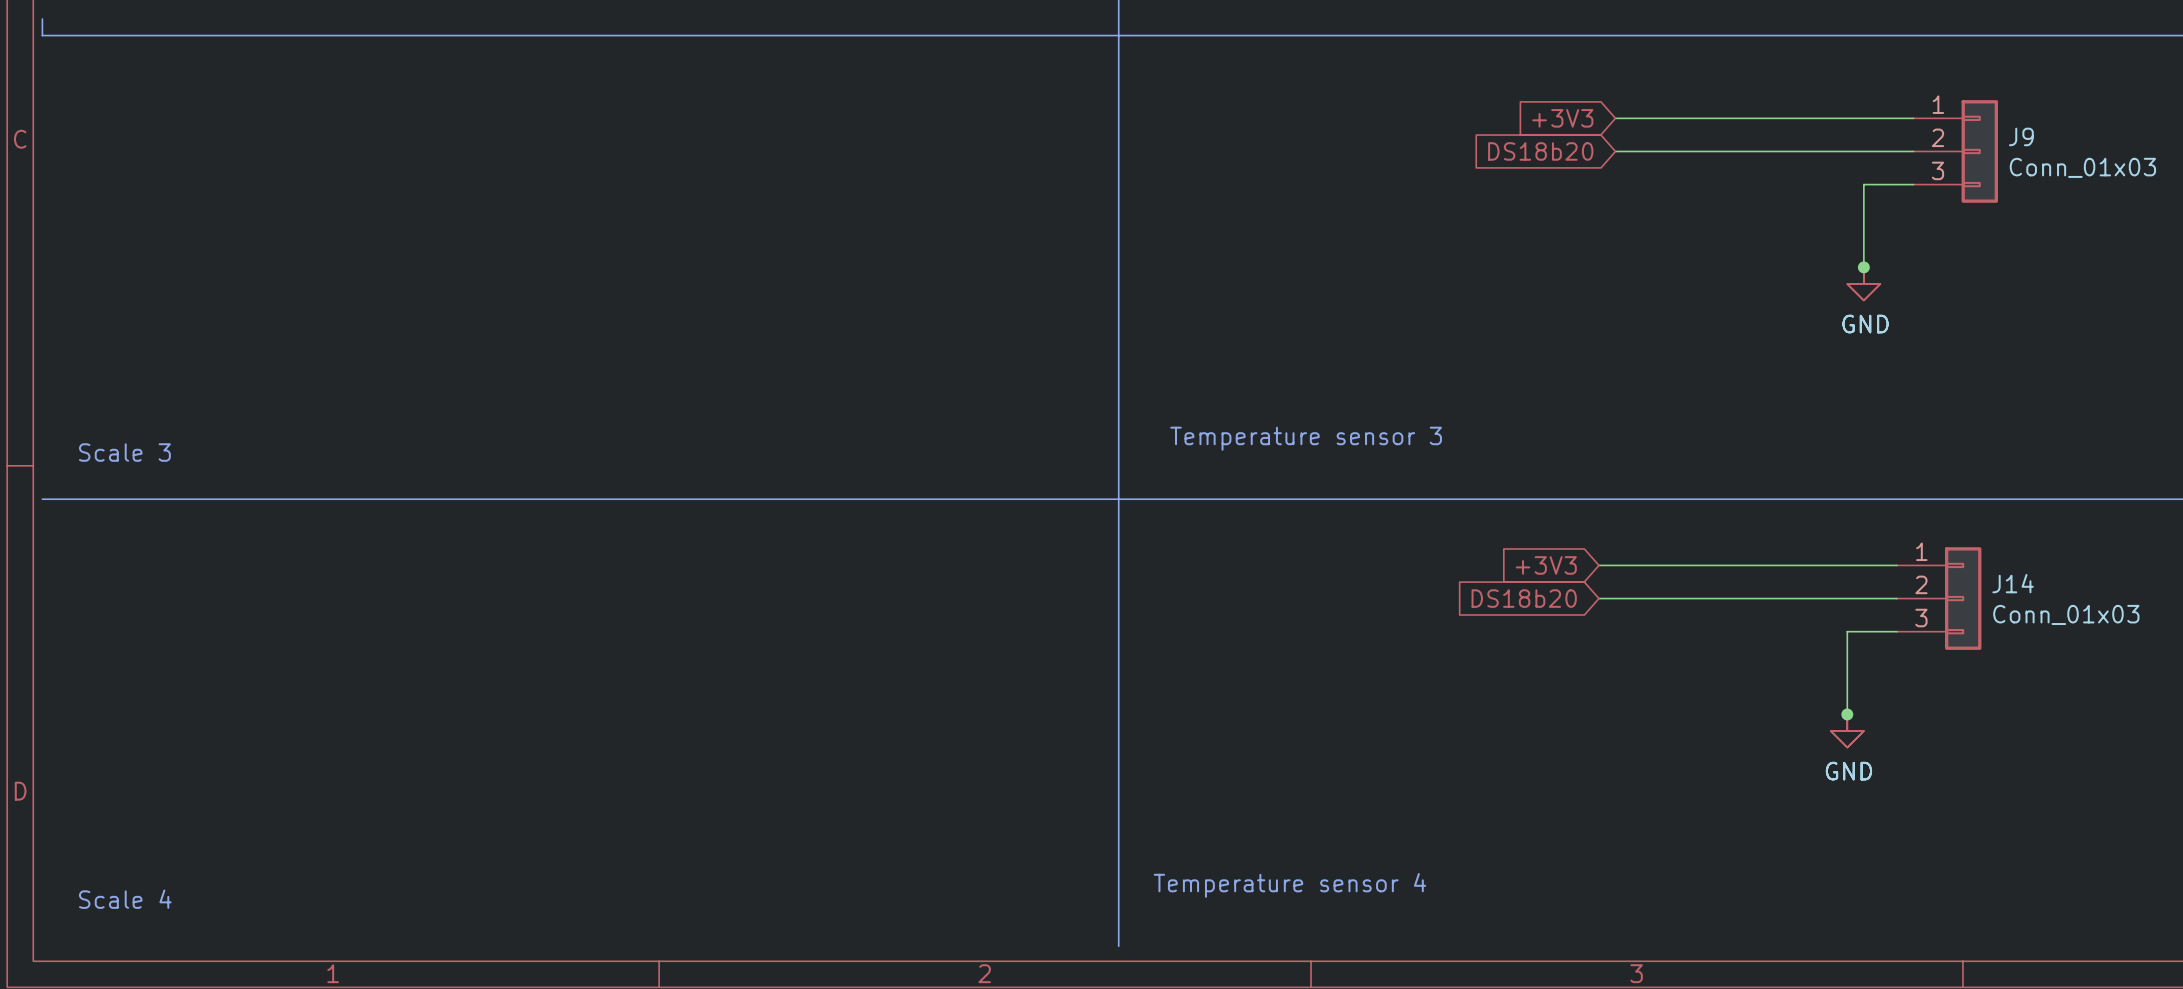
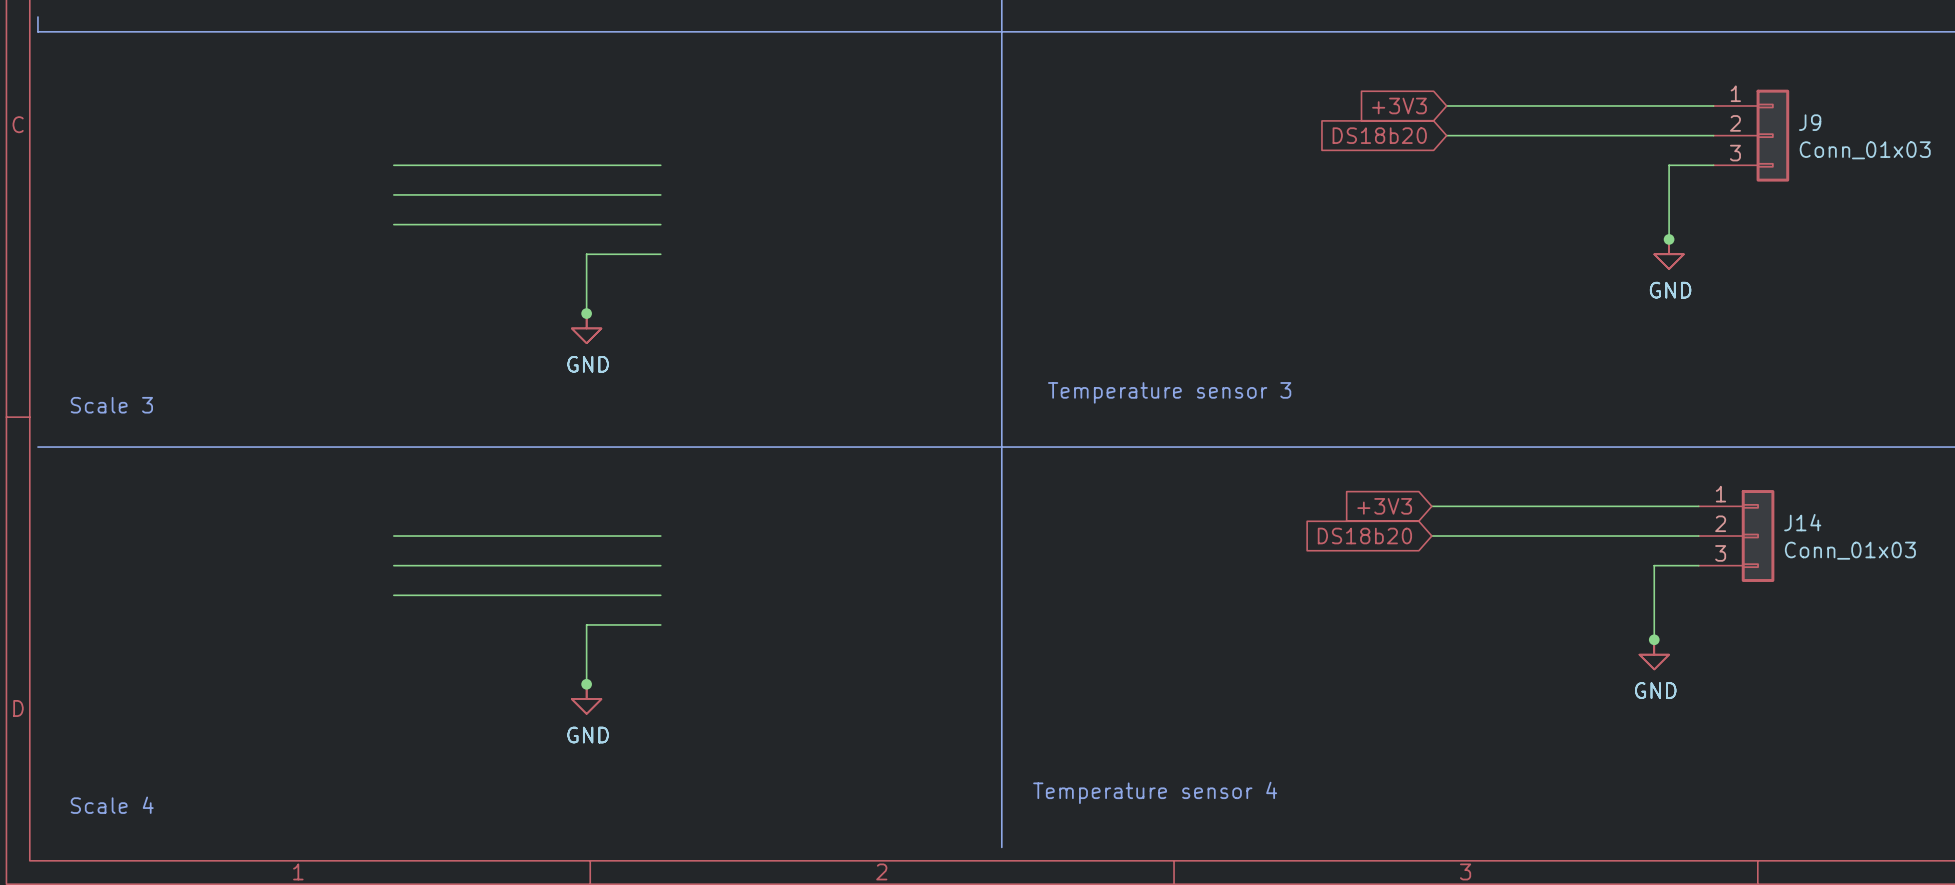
wire: none -> (393, 165) (660, 165)
wire: none -> (393, 194) (660, 194)
wire: none -> (393, 224) (660, 224)
wire: none -> (660, 254) (586, 254) (586, 313)
junction: none -> (586, 313)
power symbol: none -> GND (586, 328)
wire: none -> (393, 536) (660, 536)
wire: none -> (393, 565) (660, 565)
wire: none -> (393, 595) (660, 595)
wire: none -> (660, 624) (586, 624) (586, 684)
junction: none -> (586, 684)
power symbol: none -> GND (586, 699)

